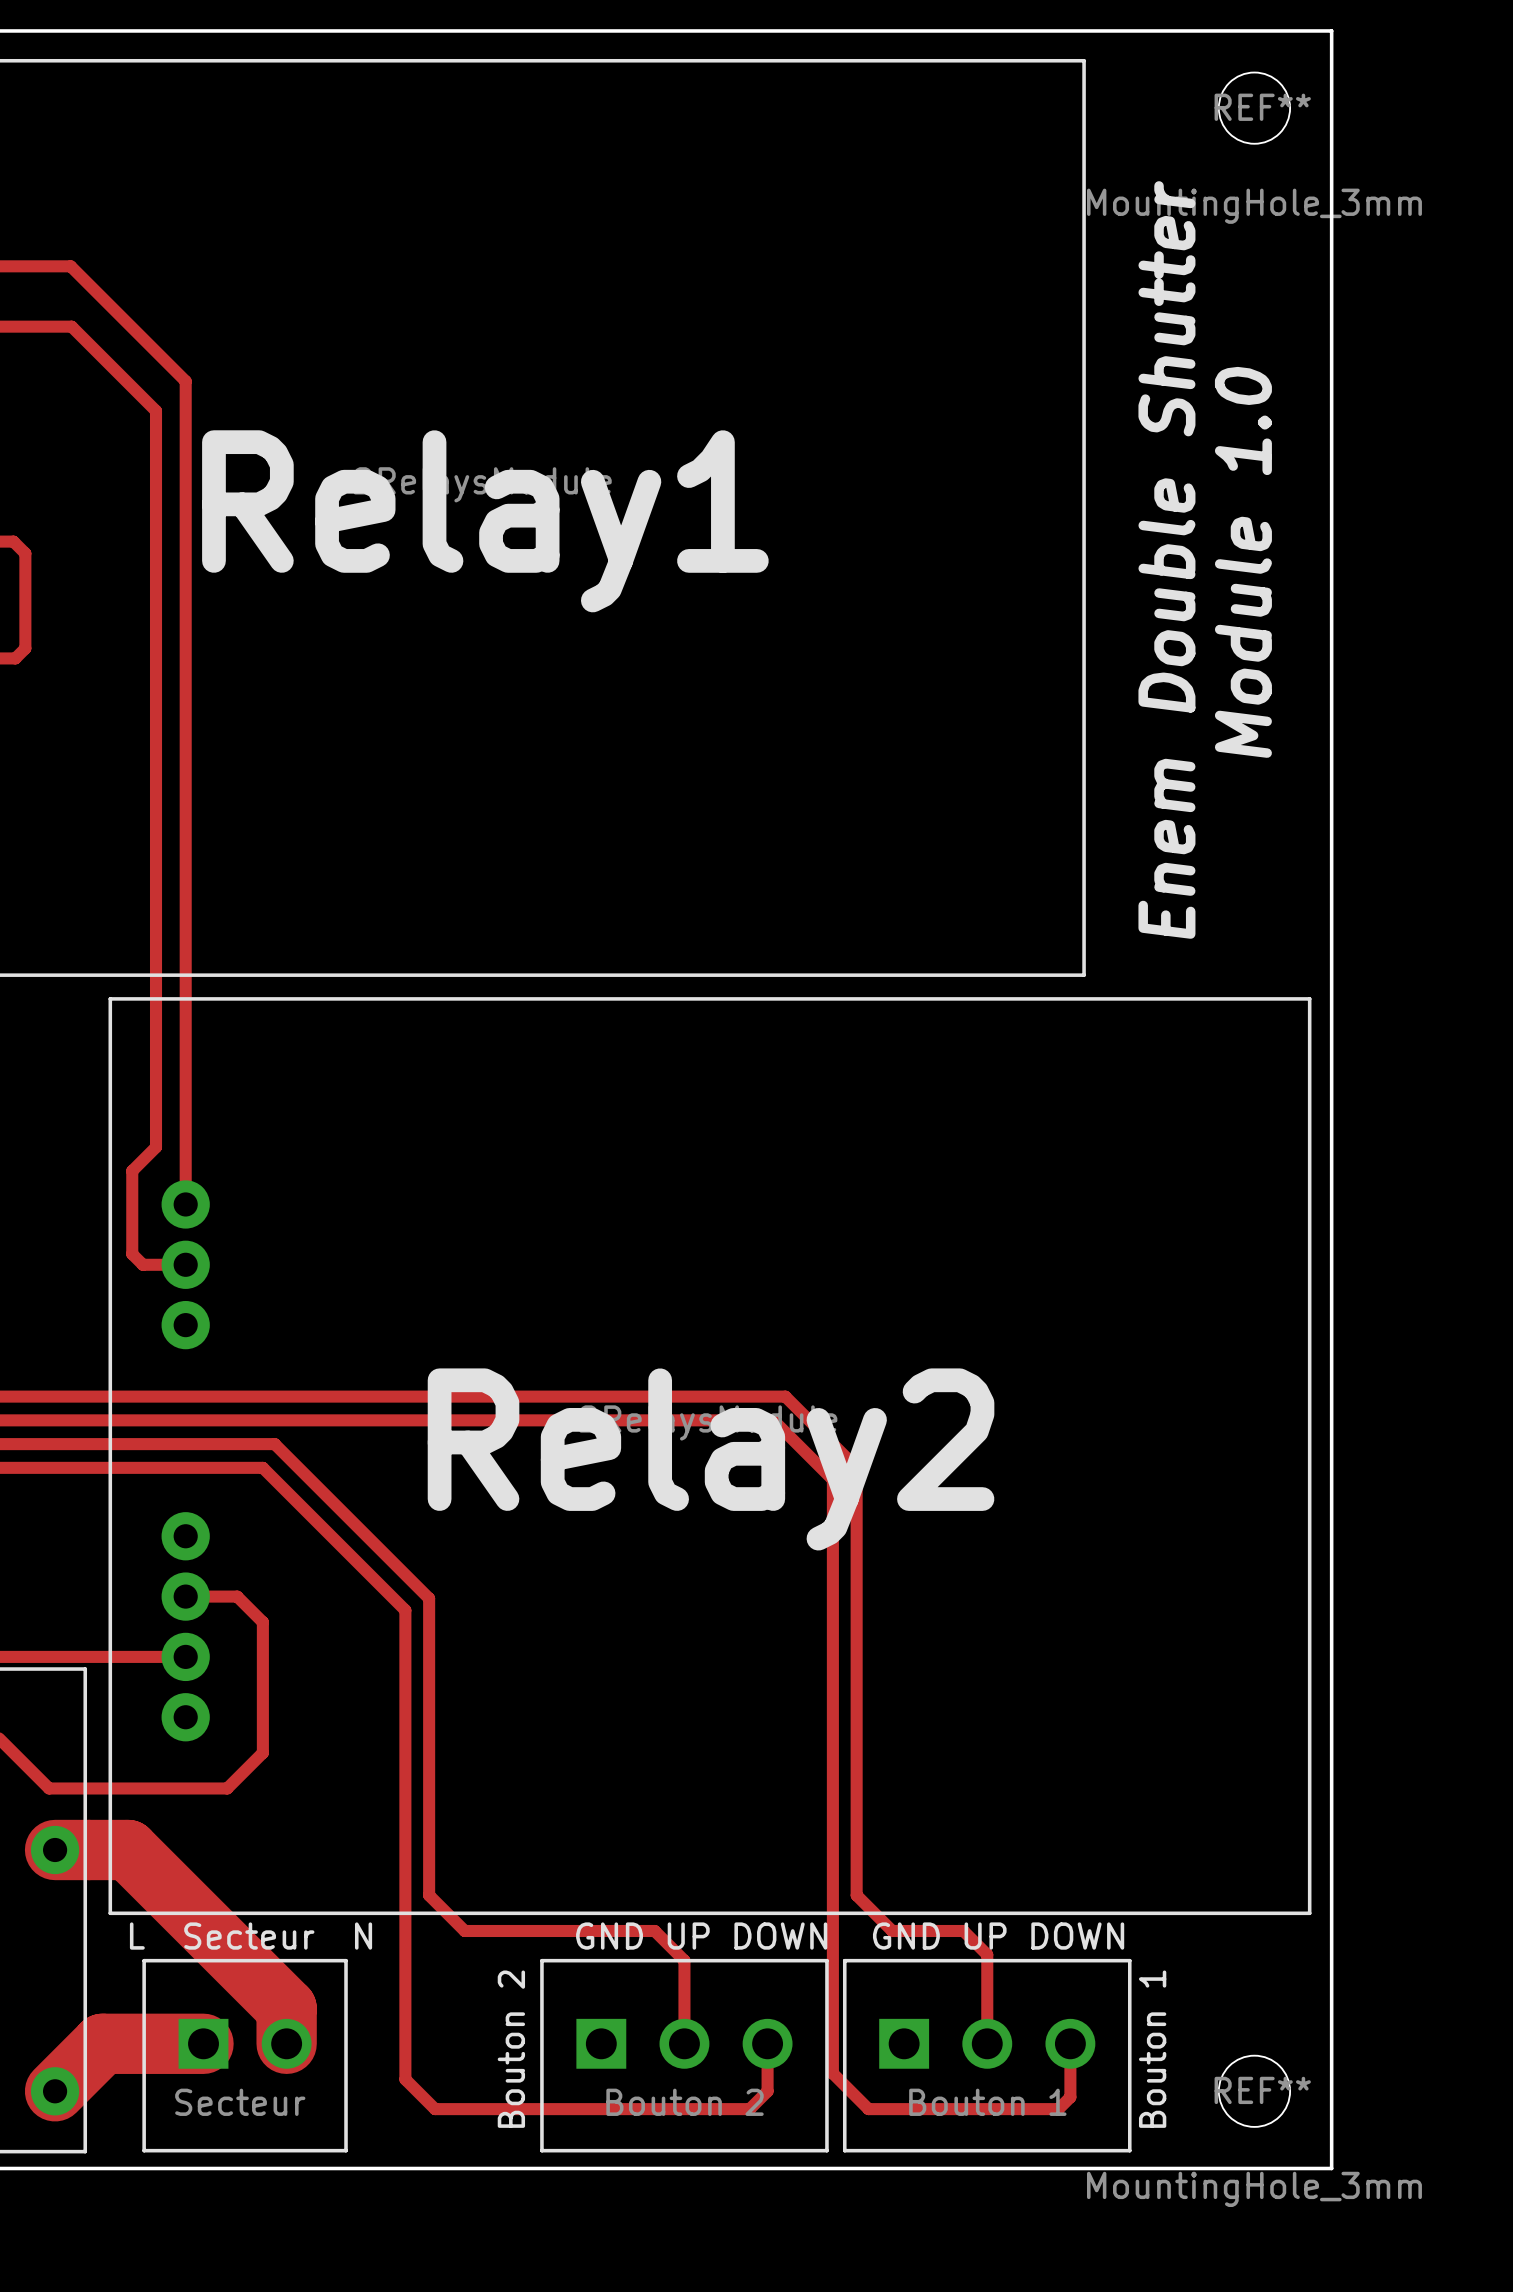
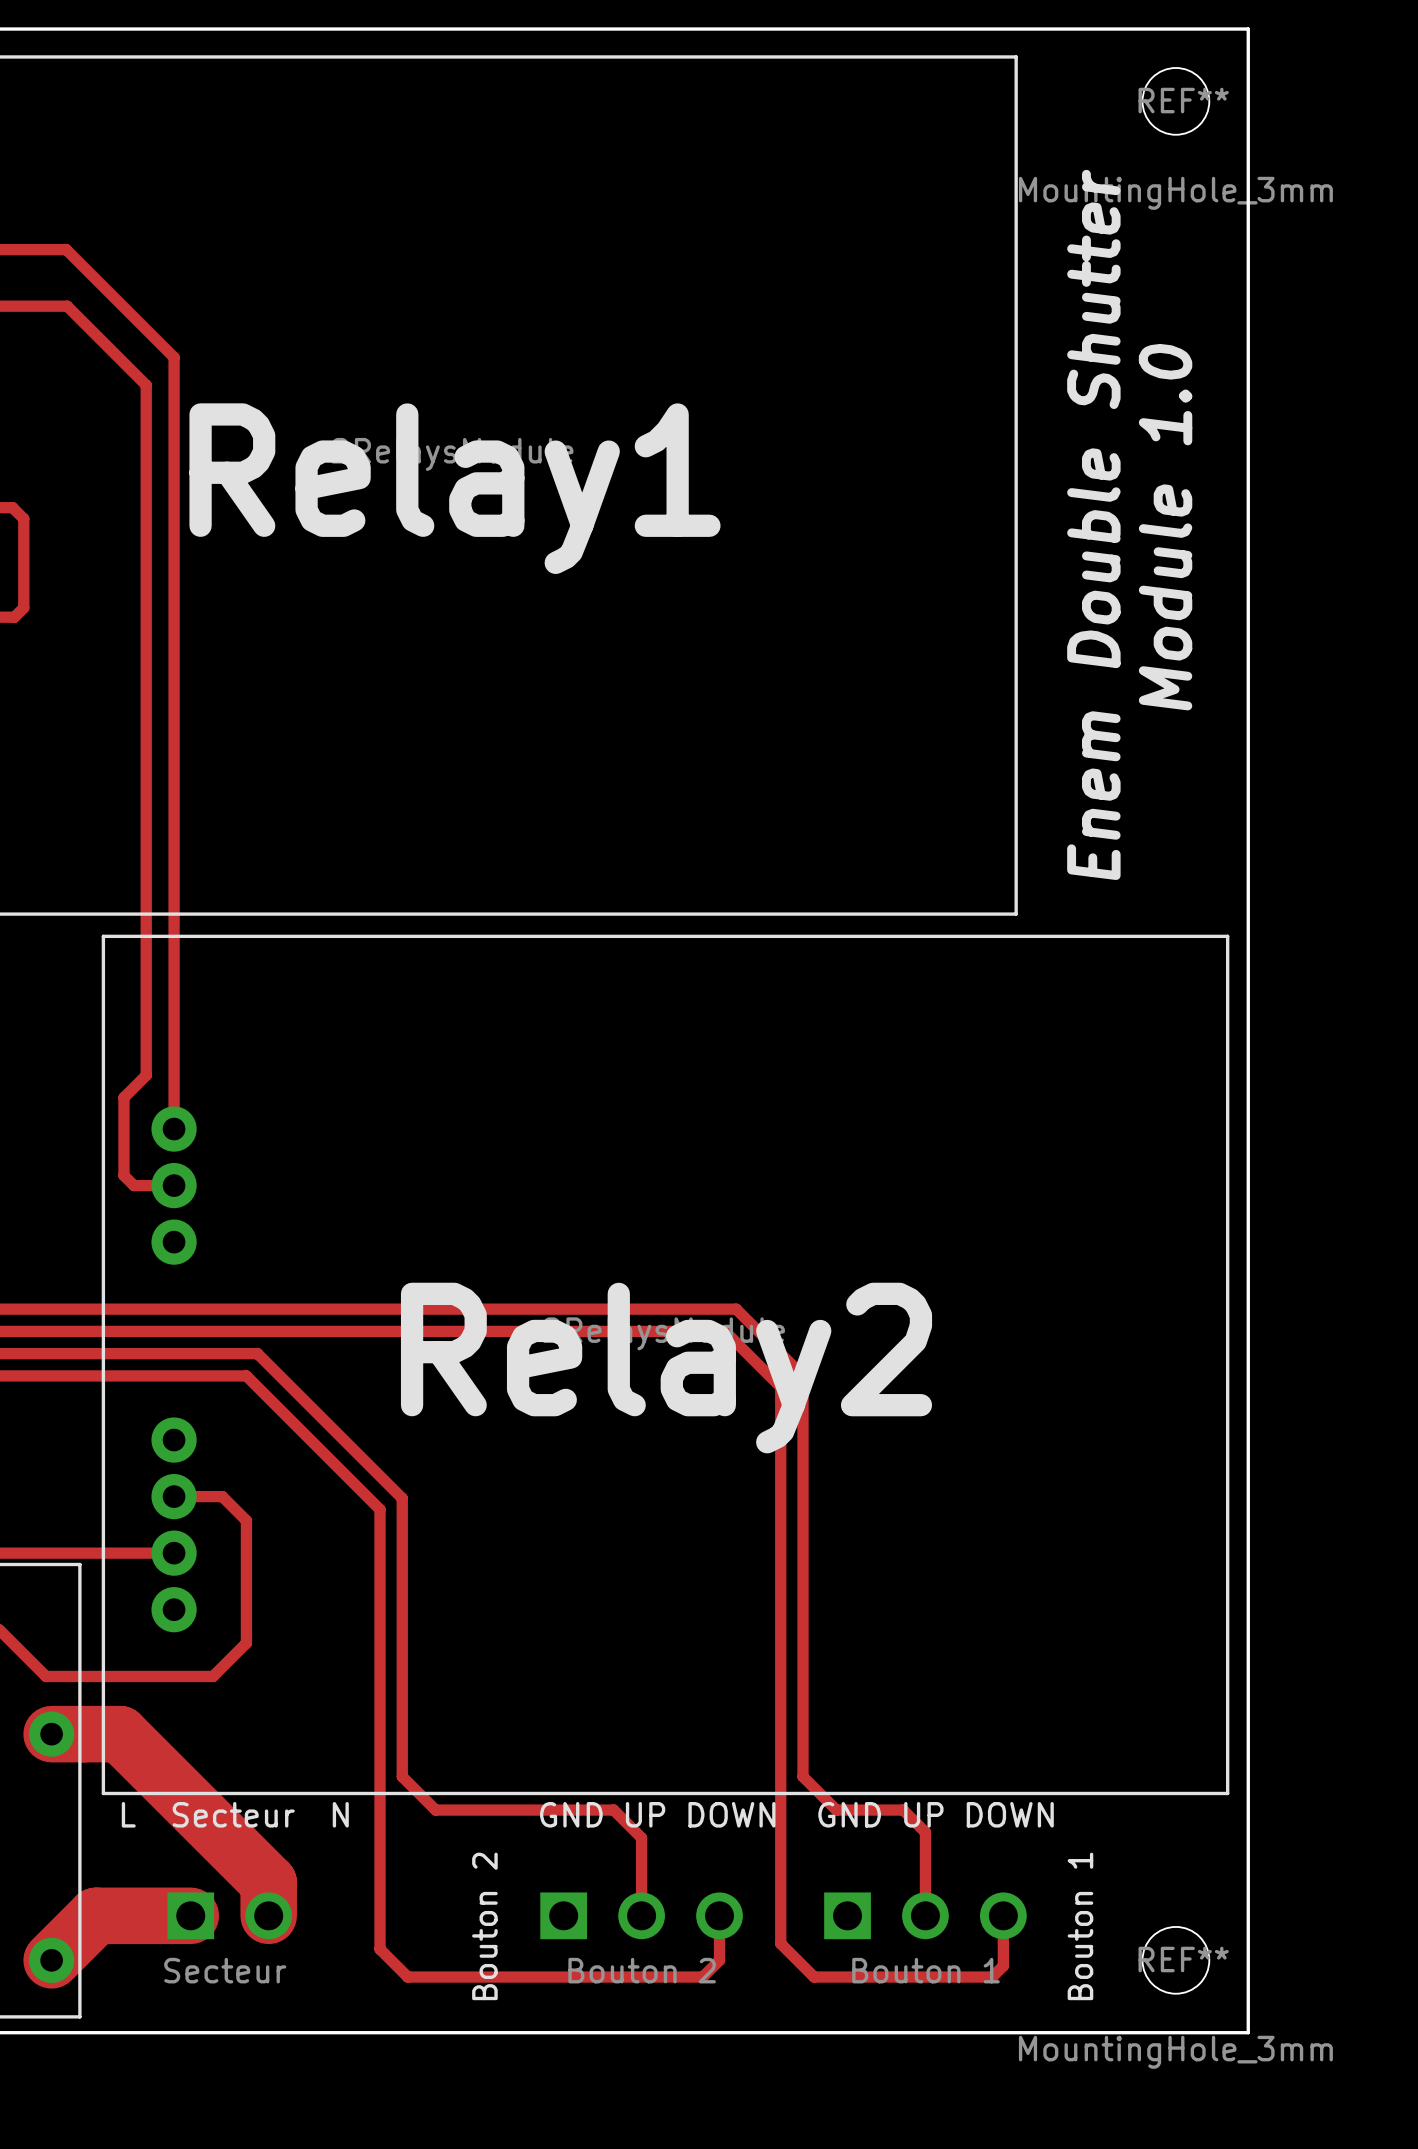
L Secteur N footprint: [142, 1958, 348, 2153] -> [167, 1892, 293, 1940]
Bouton 2 footprint: [540, 1958, 829, 2153] -> [540, 1892, 743, 1940]
Bouton 1 footprint: [842, 1958, 1132, 2153] -> [824, 1892, 1027, 1940]

